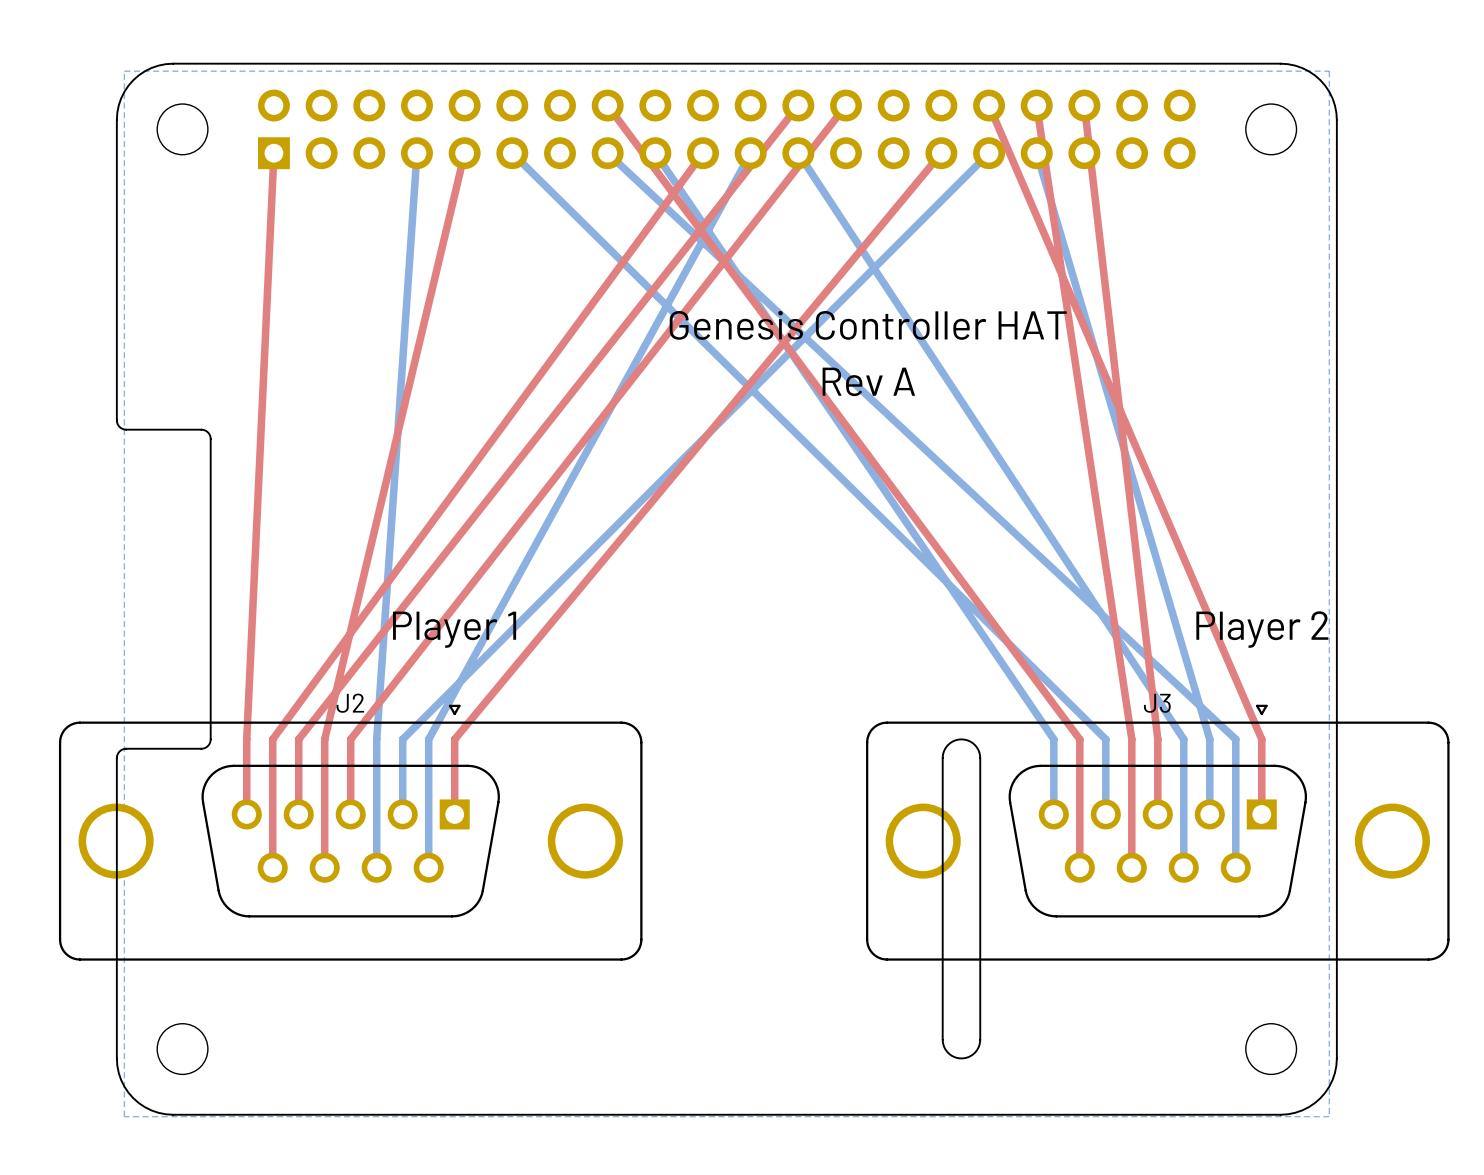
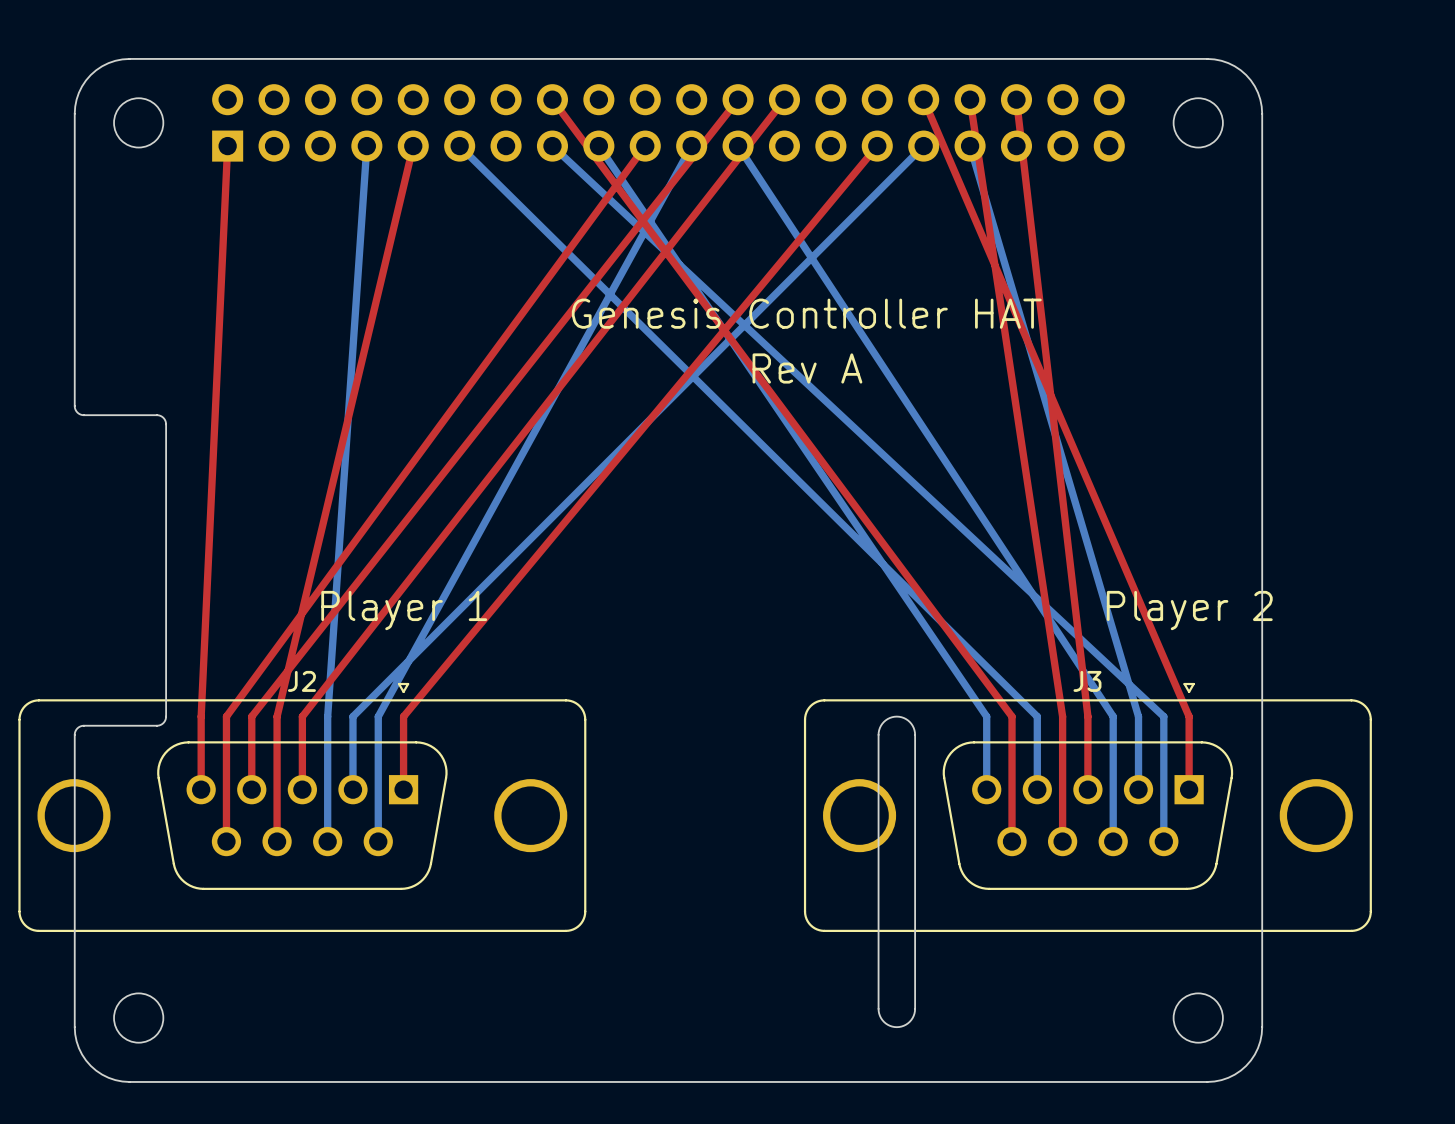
bottom zone outline: (124, 71) (1329, 71) (1329, 1116) (124, 1116) (124, 71) -> none

